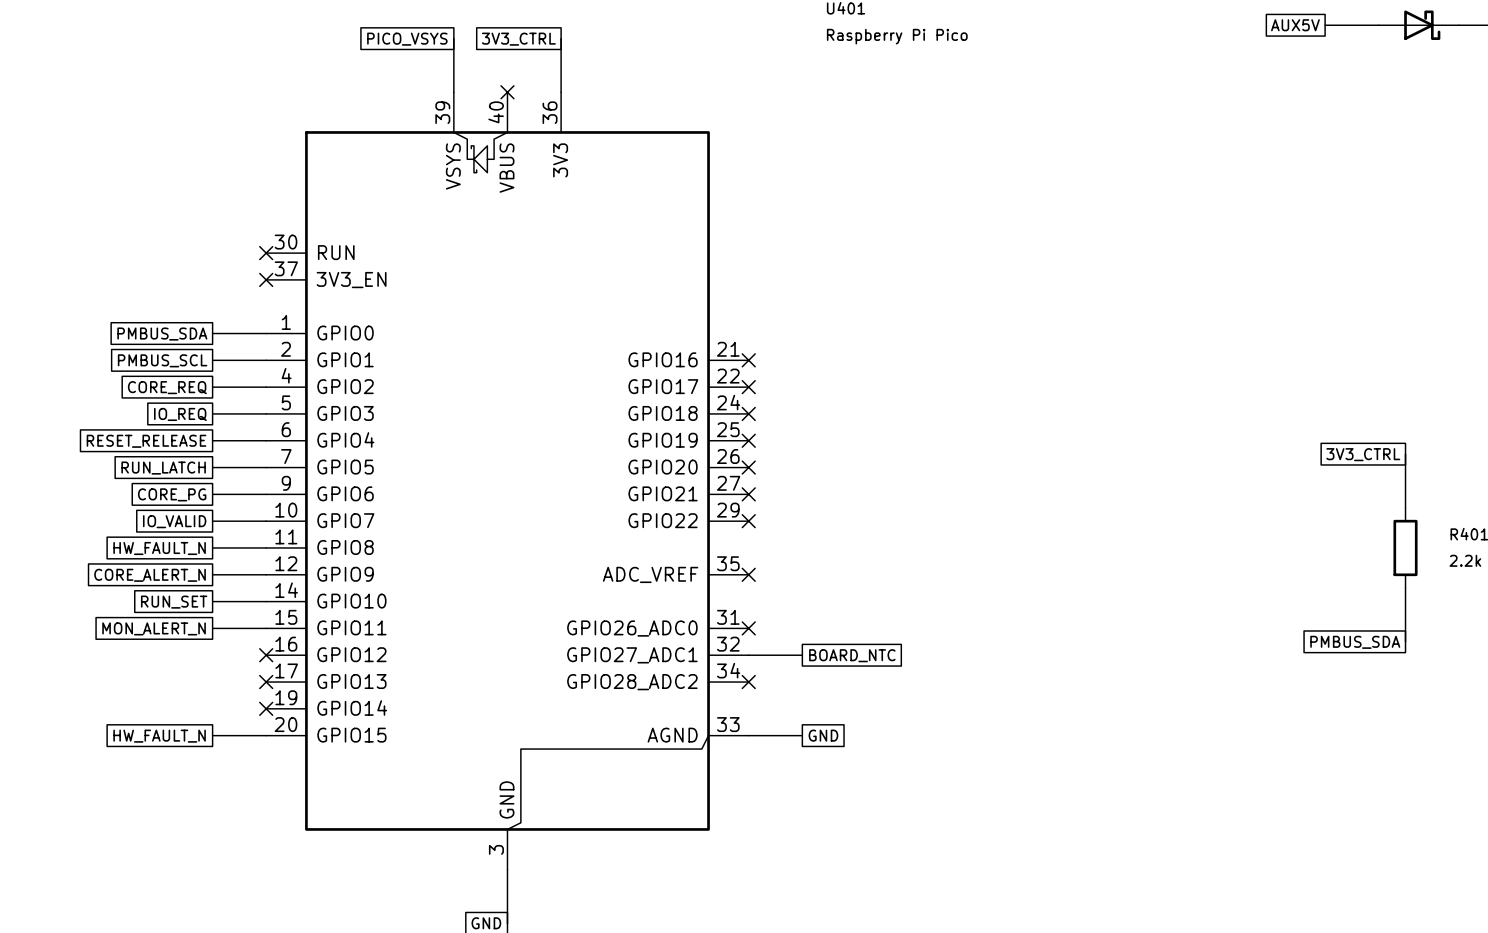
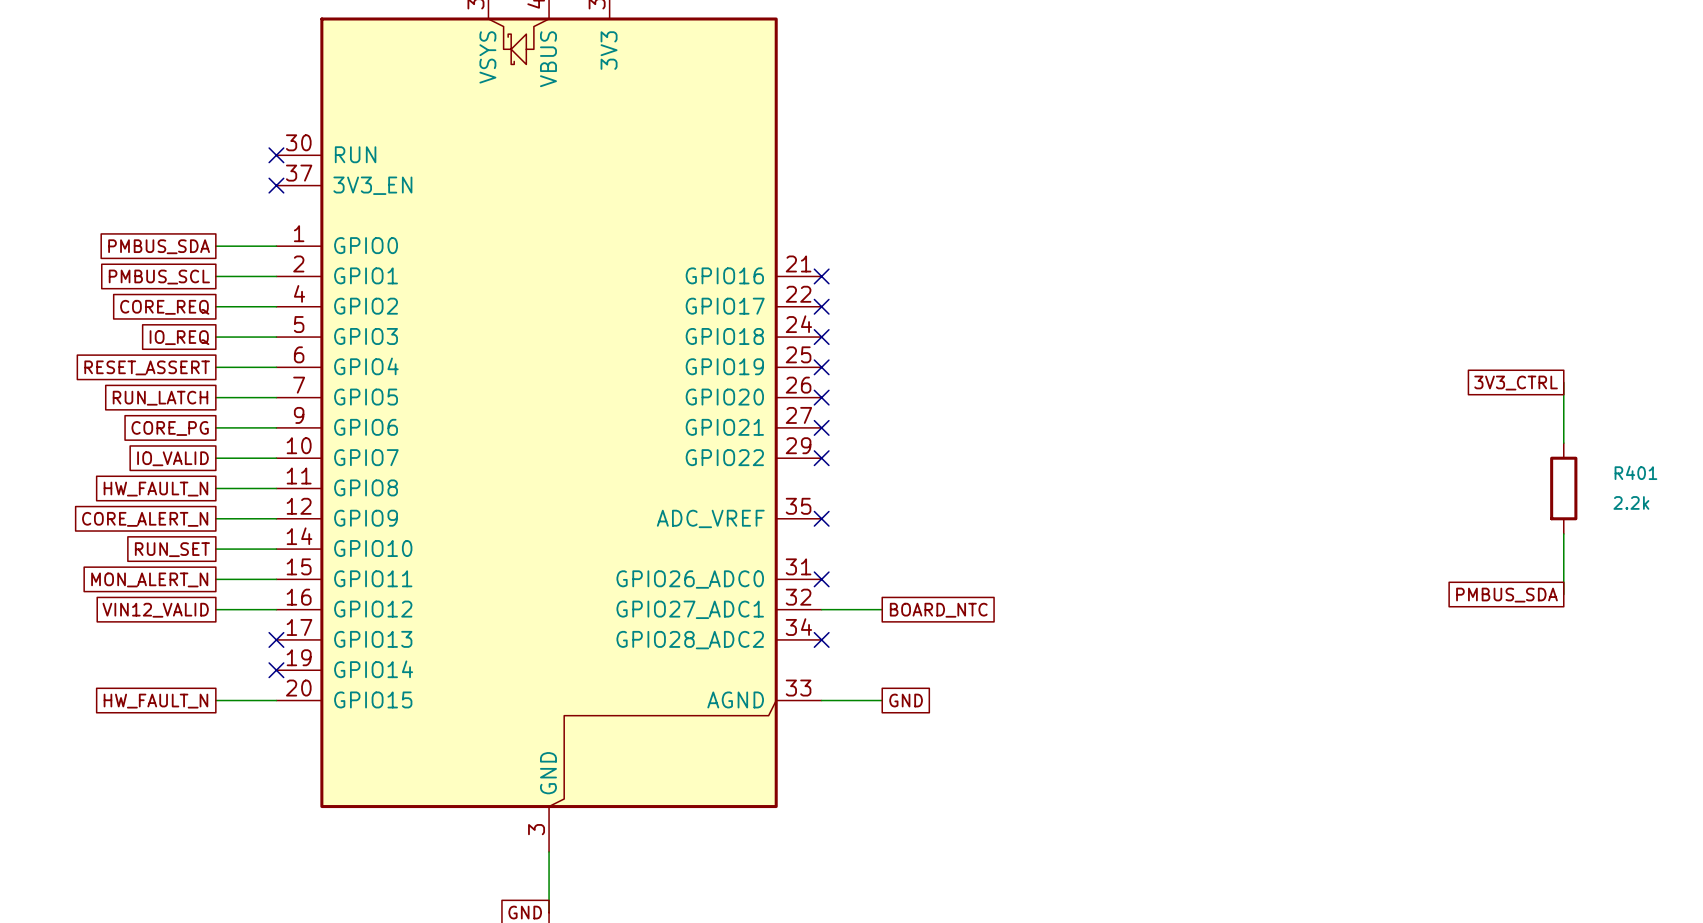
global label: RESET_RELEASE (146, 441) -> RESET_ASSERT (147, 367)
global label: none -> VIN12_VALID (155, 610)
wire: none -> (215, 609) (276, 609)
no-connect mark: (266, 655) -> none

